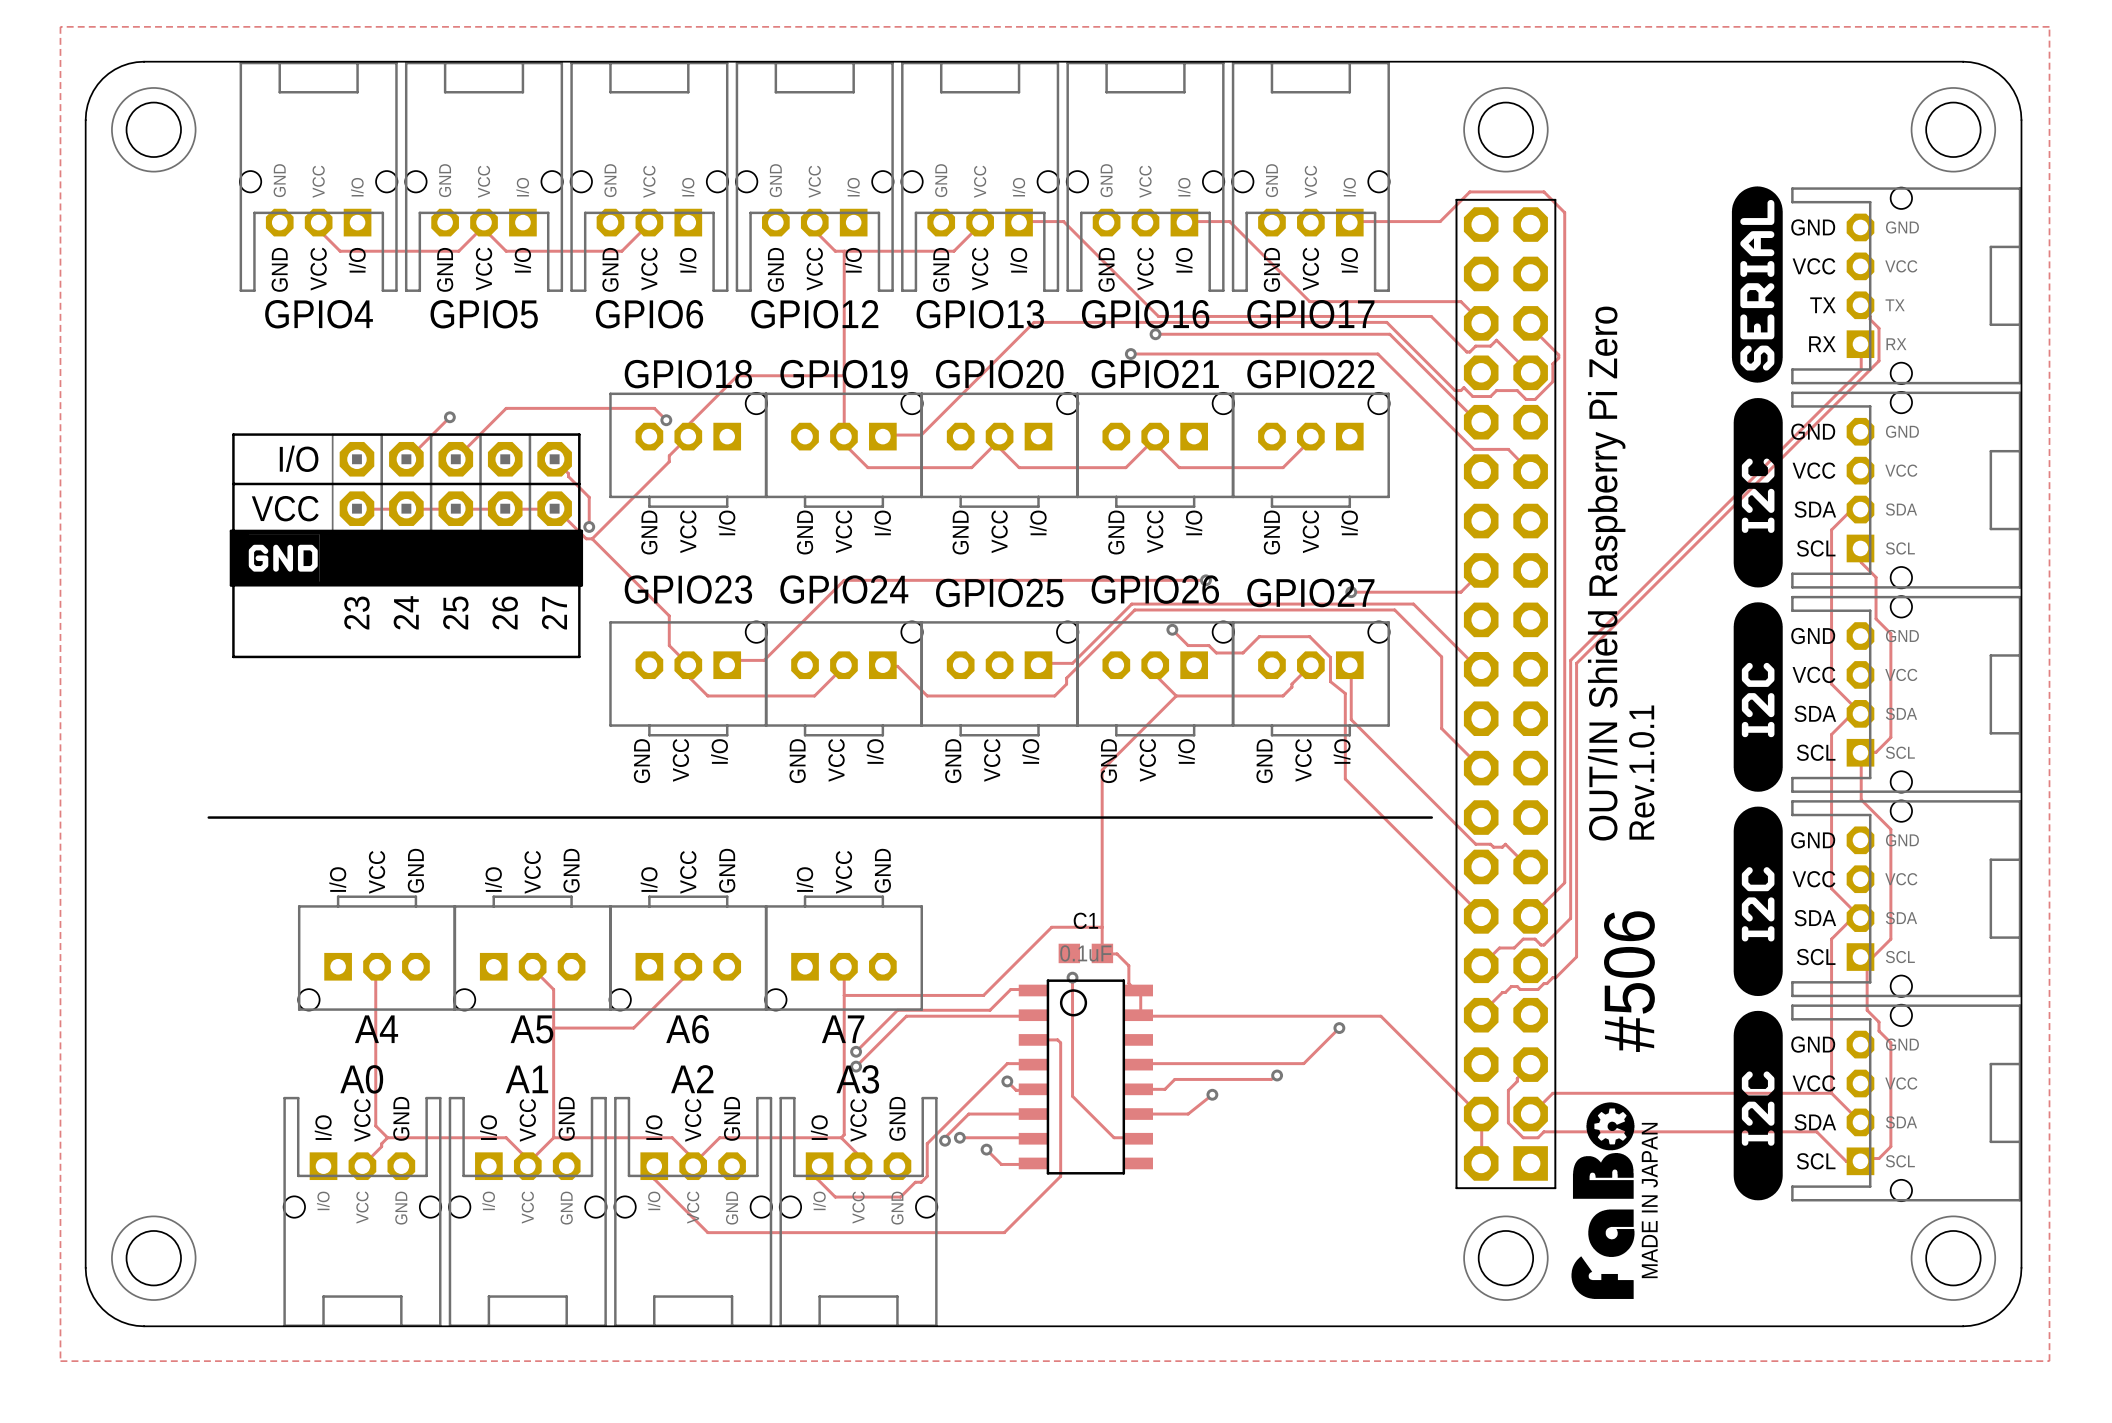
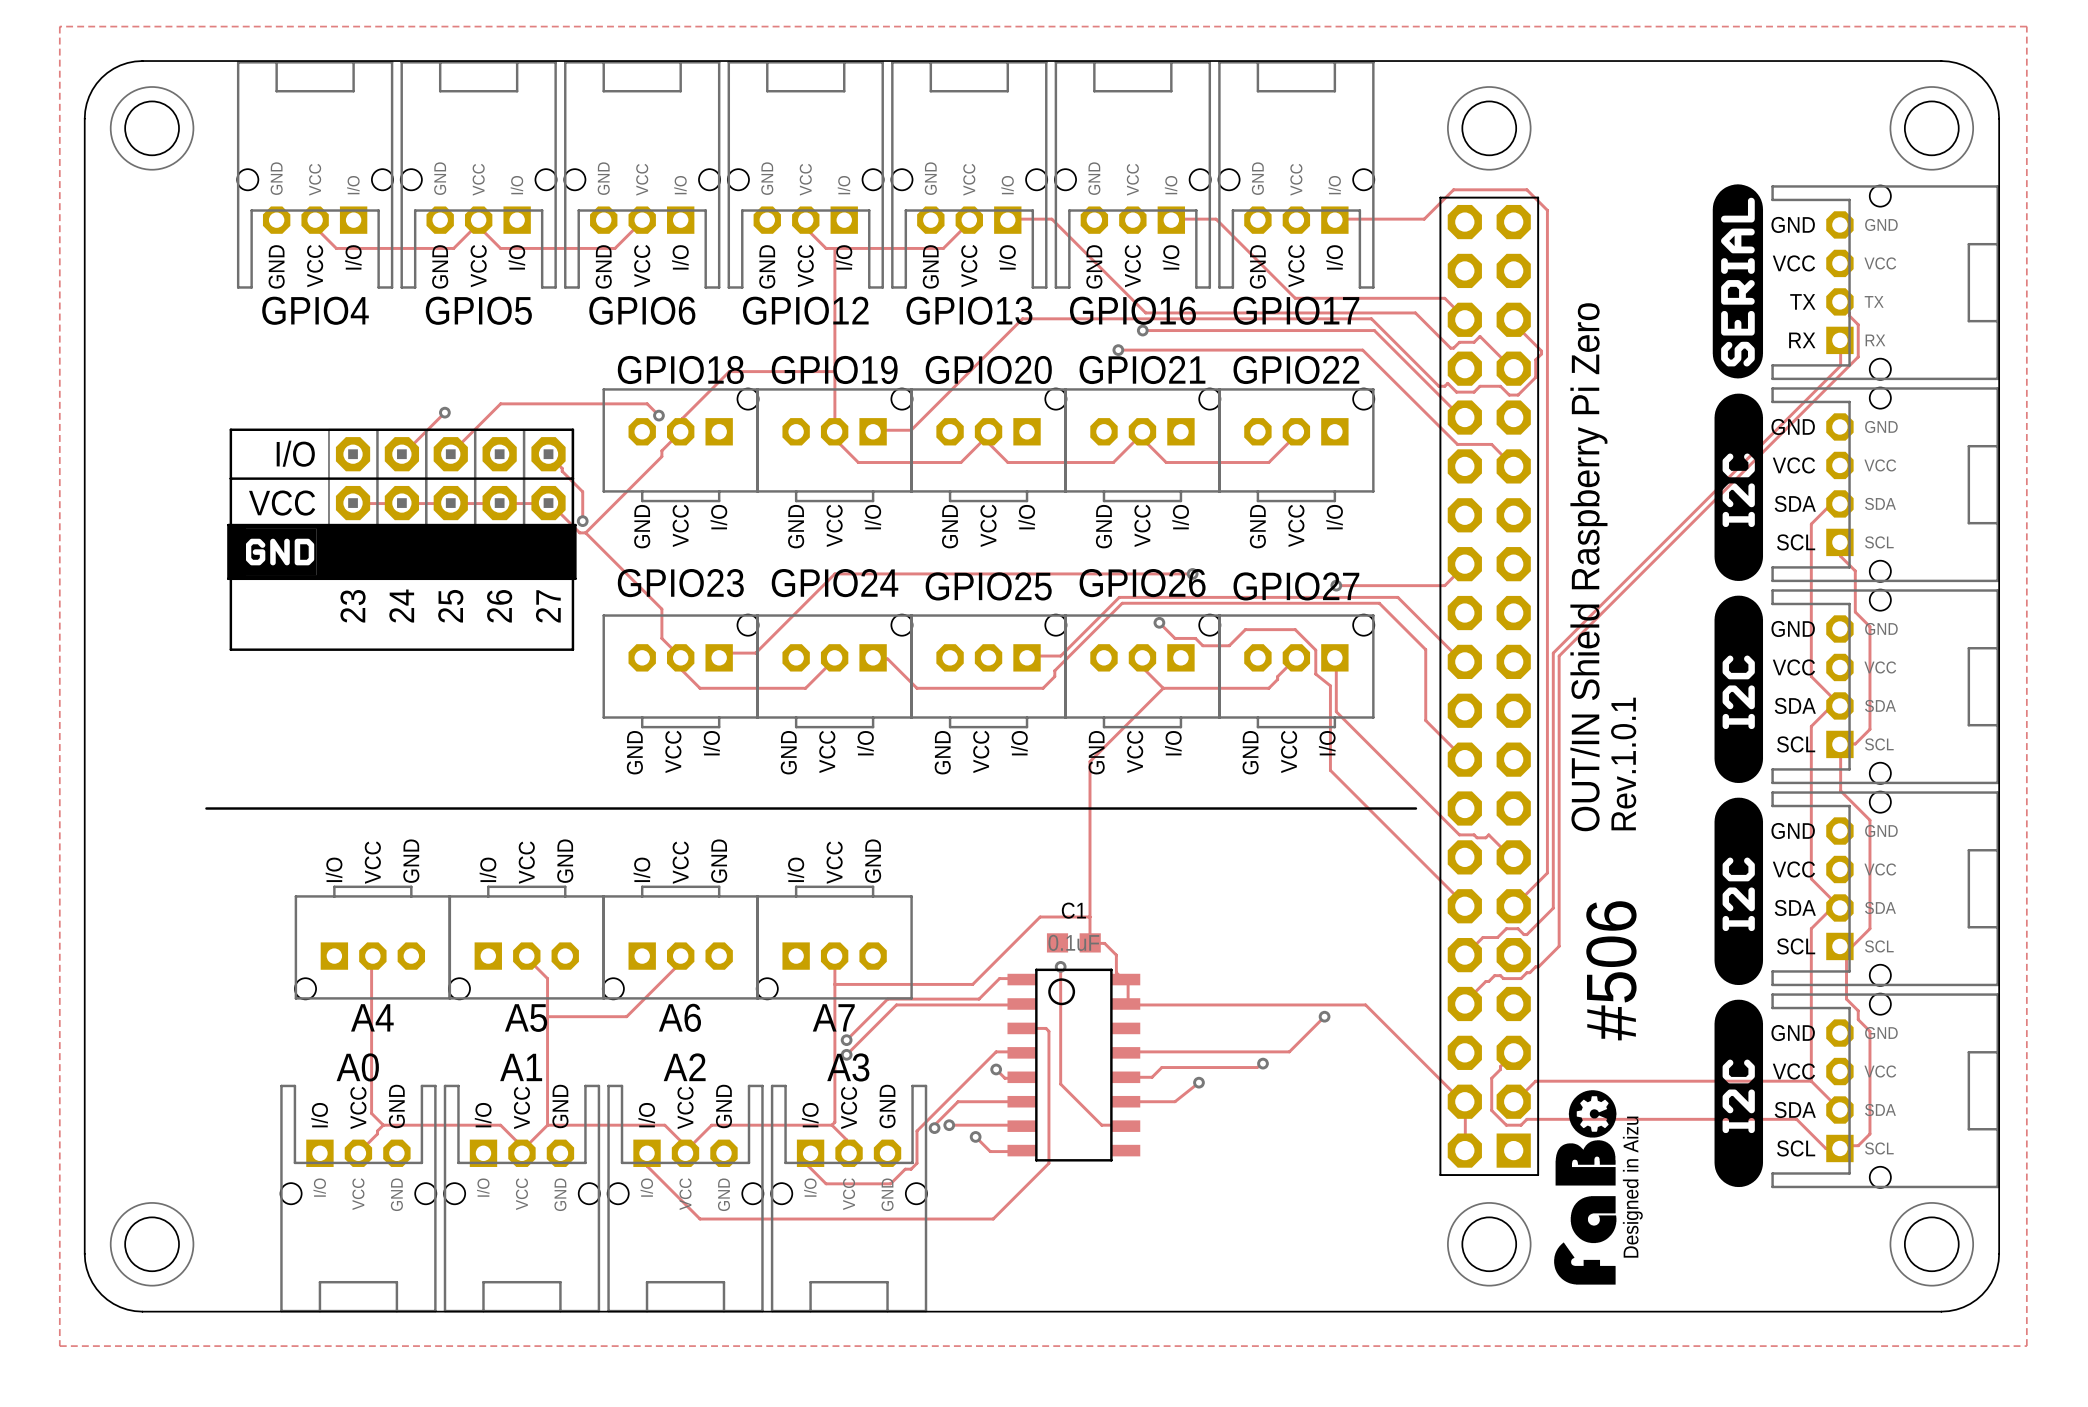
text: MADE IN JAPAN (1649, 1200) -> Designed in Aizu (1632, 1187)

